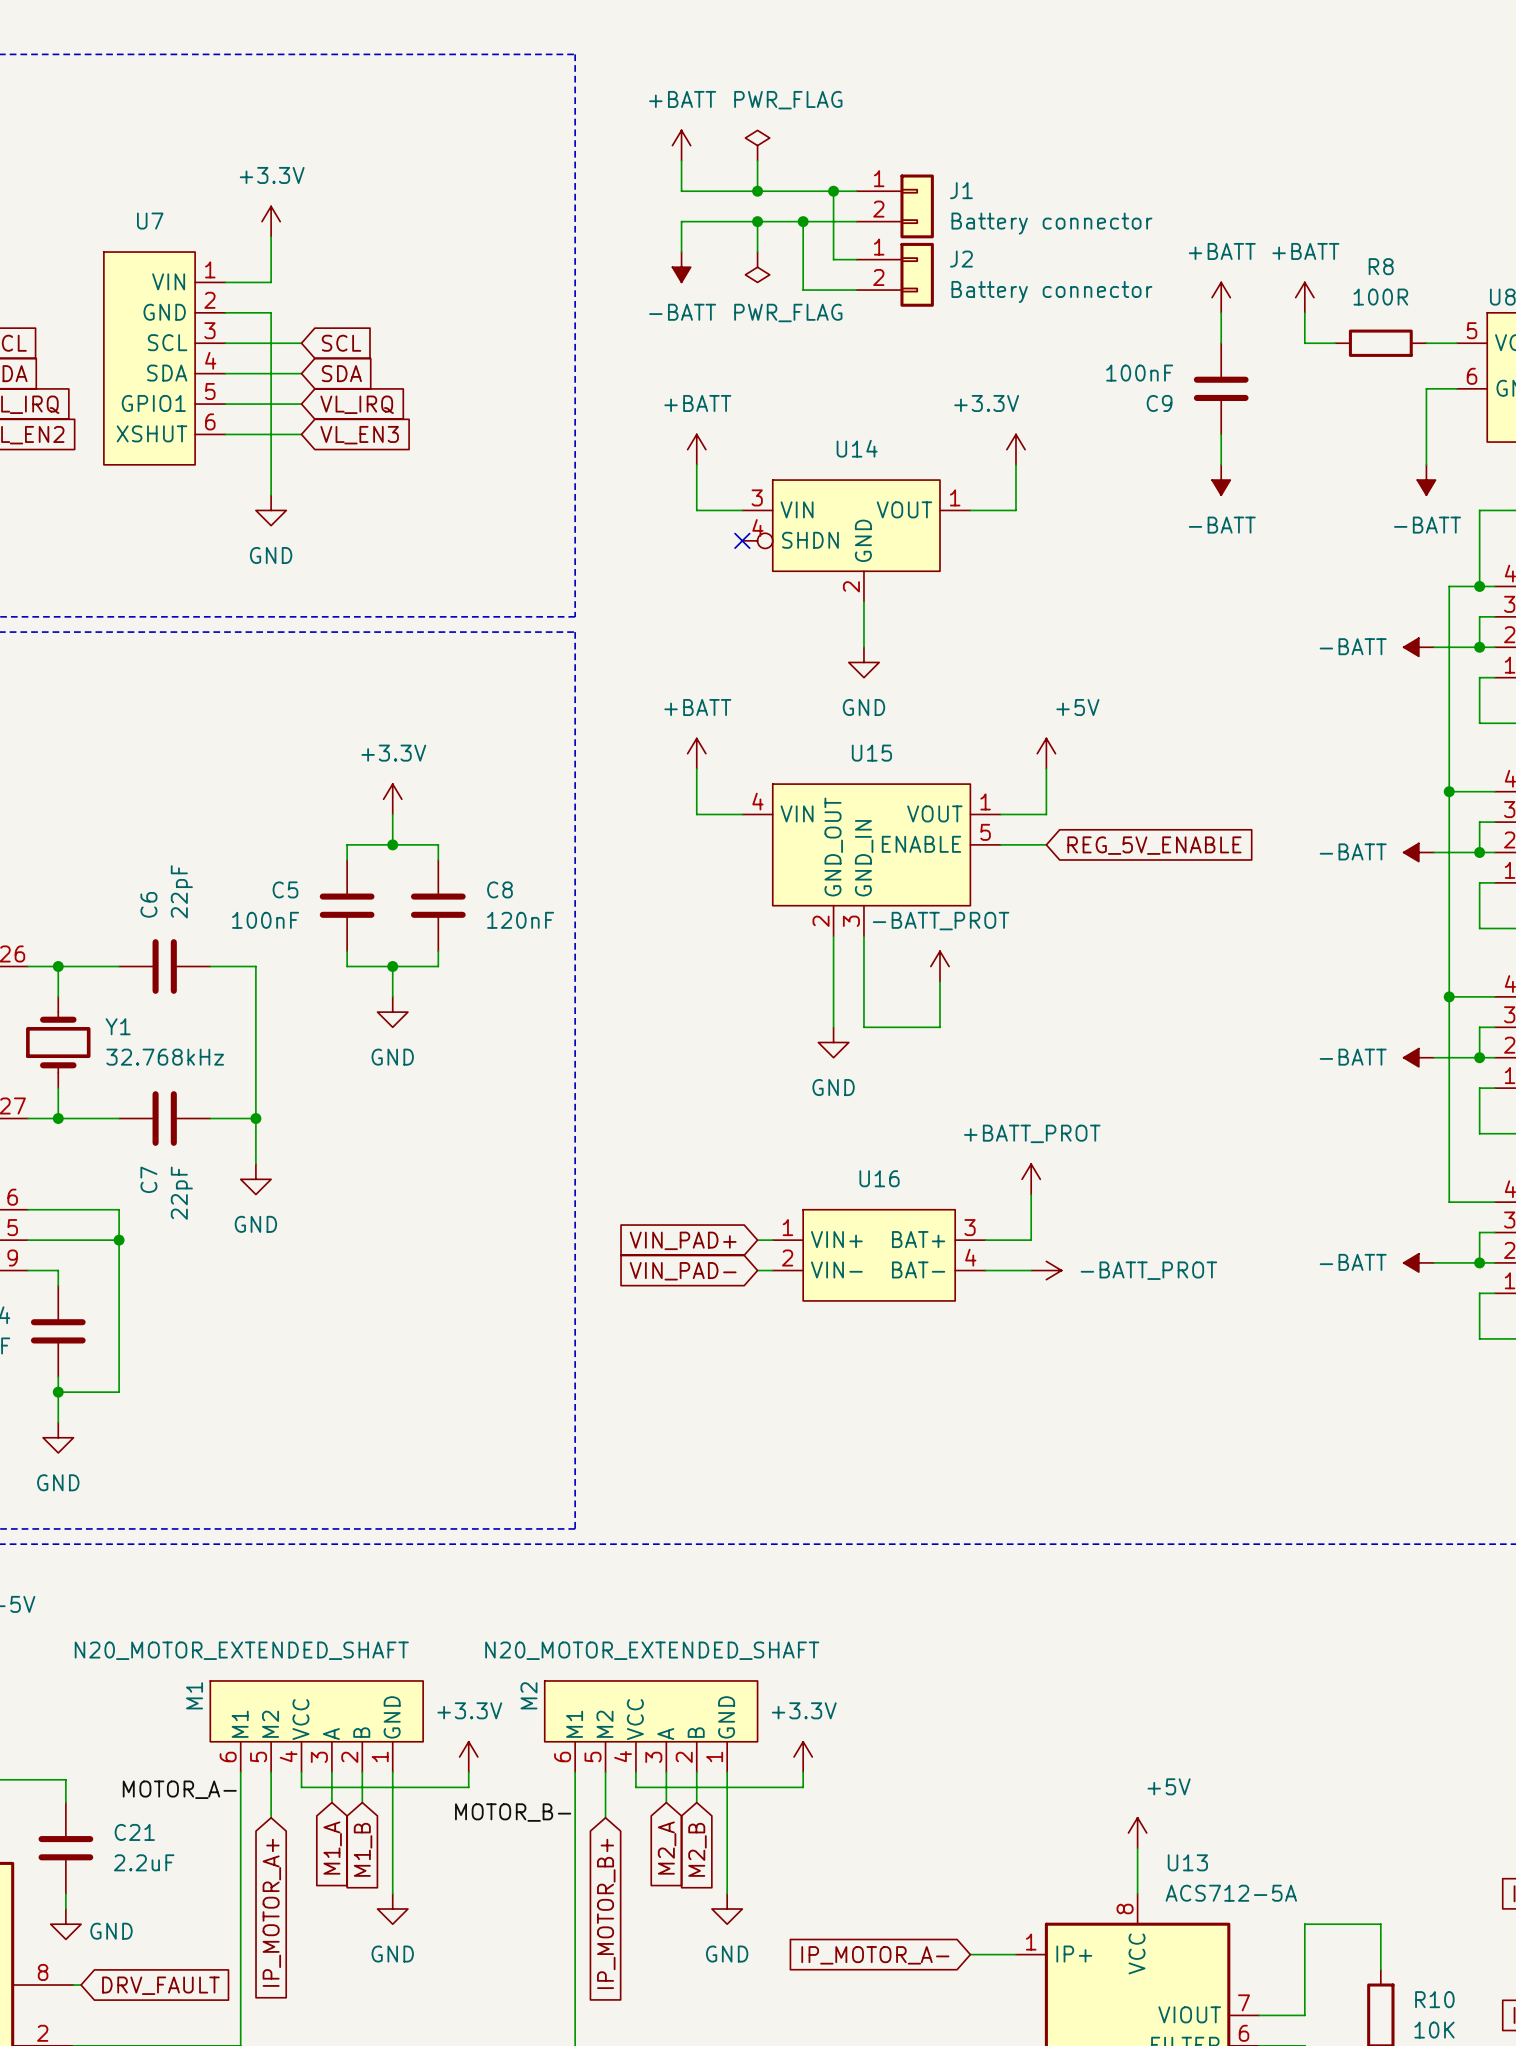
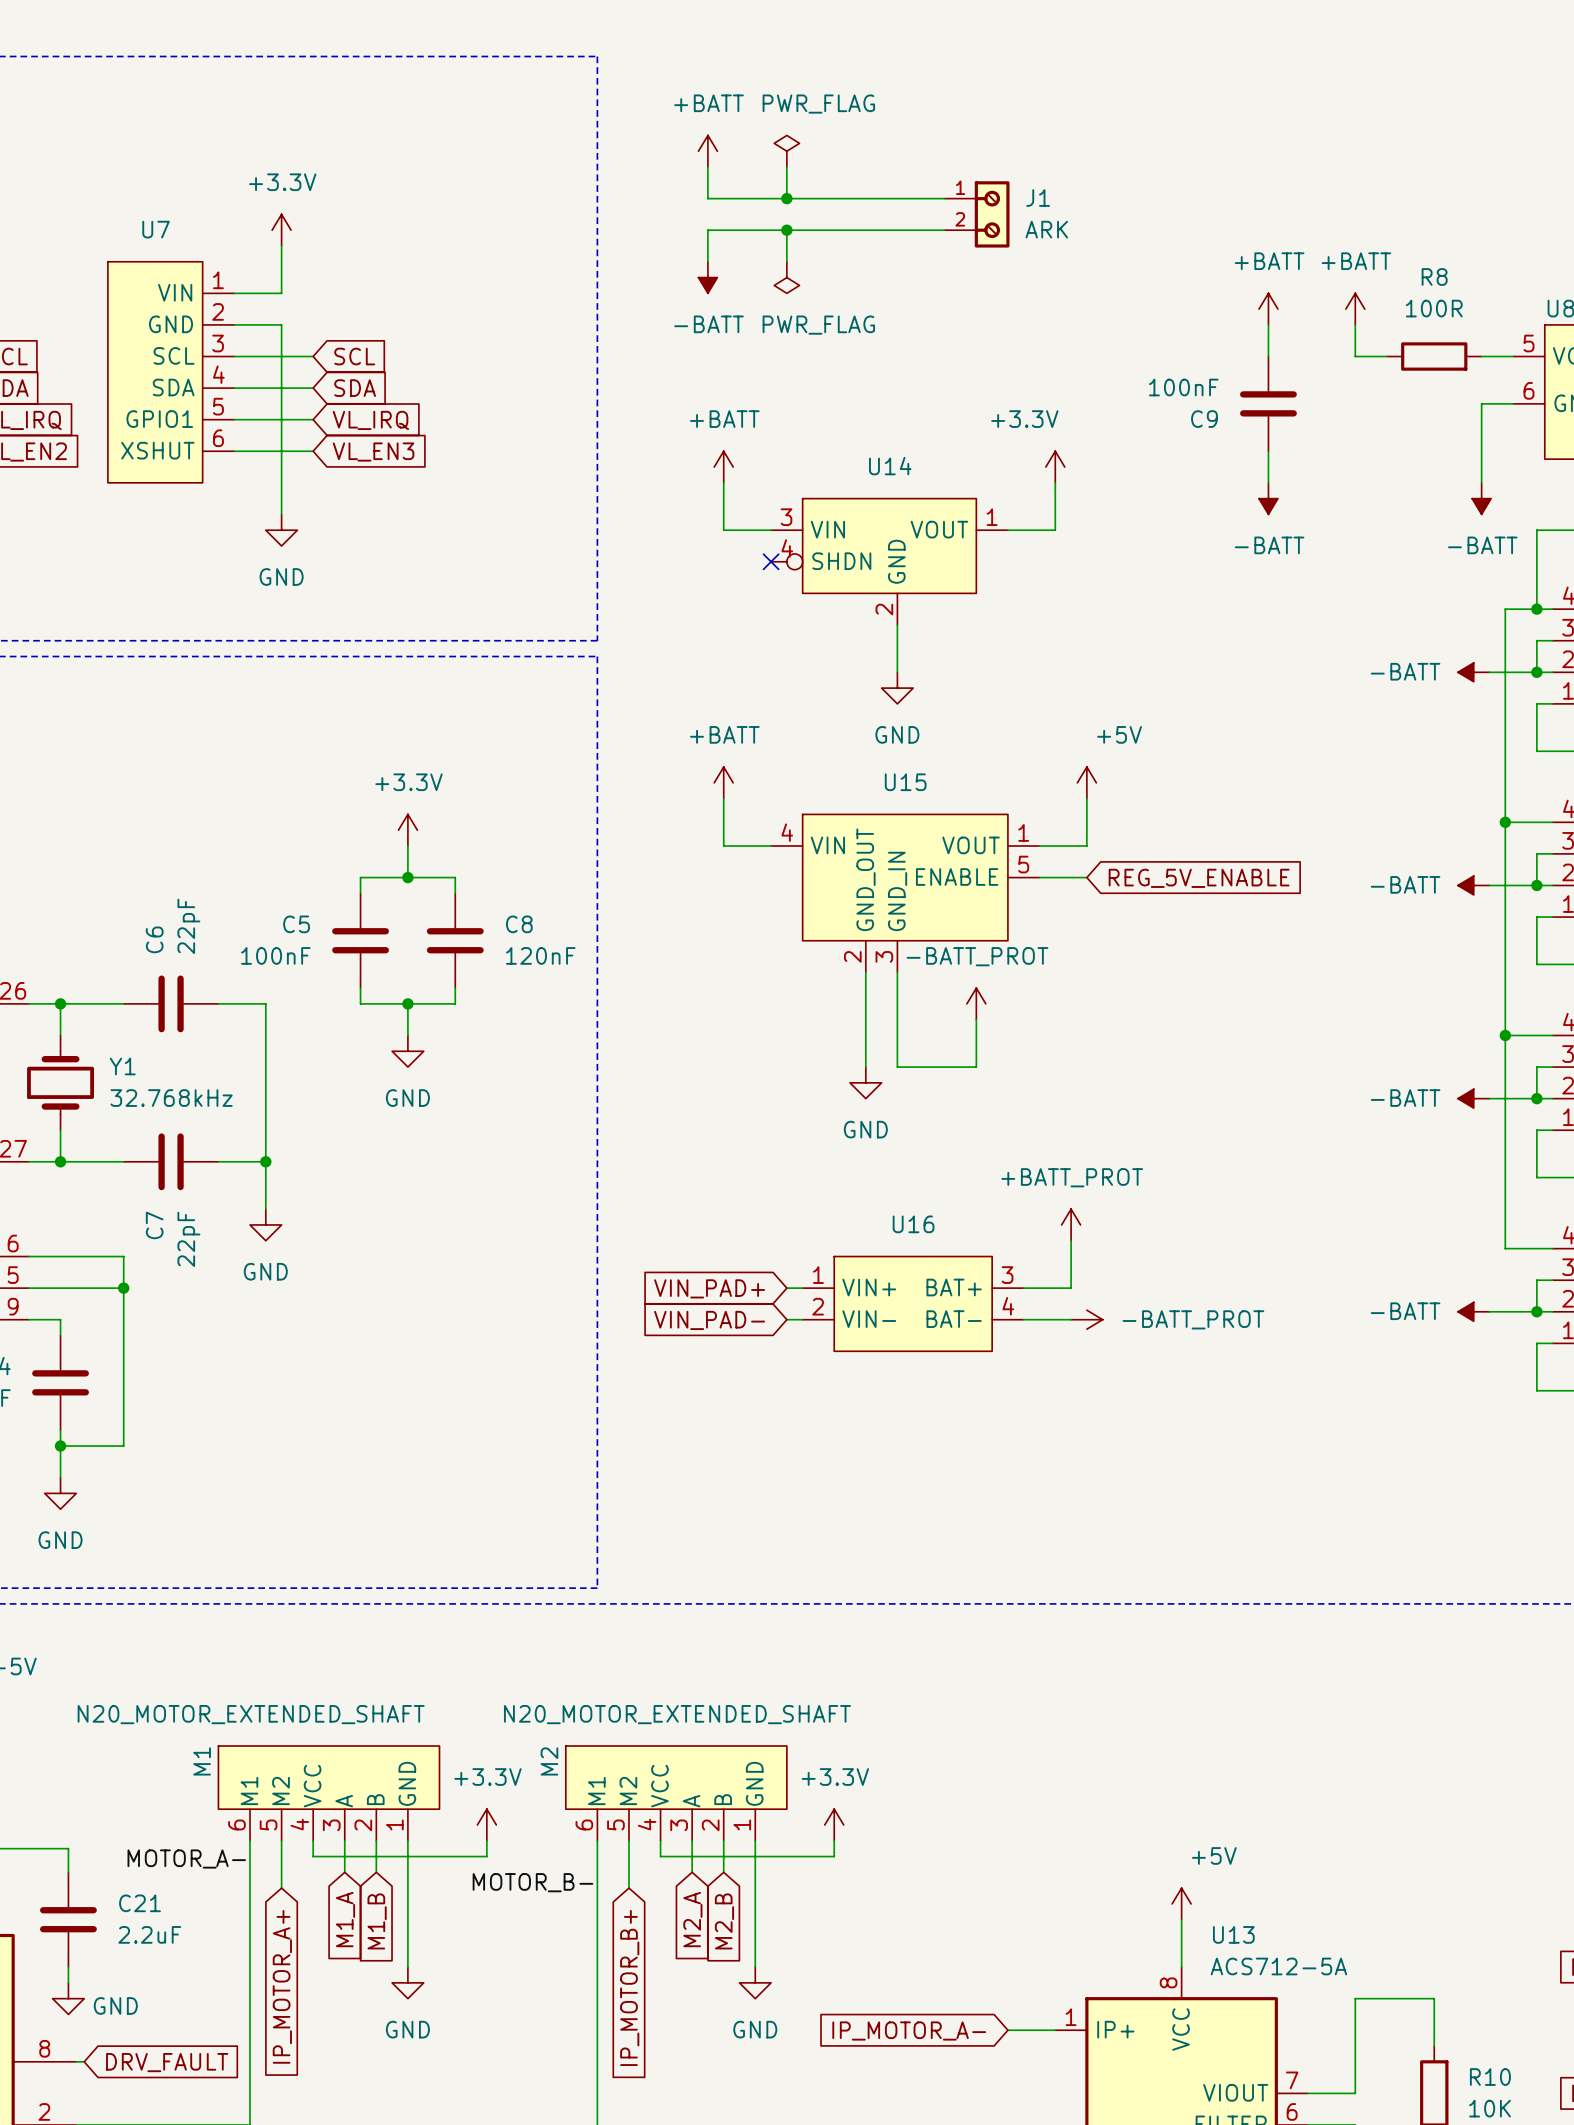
J1 symbol: [856, 174, 934, 239] -> [944, 181, 1010, 248]
wire: (833, 191) (833, 259) (856, 259) -> none
junction: (833, 191) -> none
wire: (803, 221) (803, 290) (856, 290) -> none
junction: (803, 221) -> none
J1 value: Battery connector (1051, 223) -> ARK (1046, 229)
J2: Battery connector (895, 274) -> none

